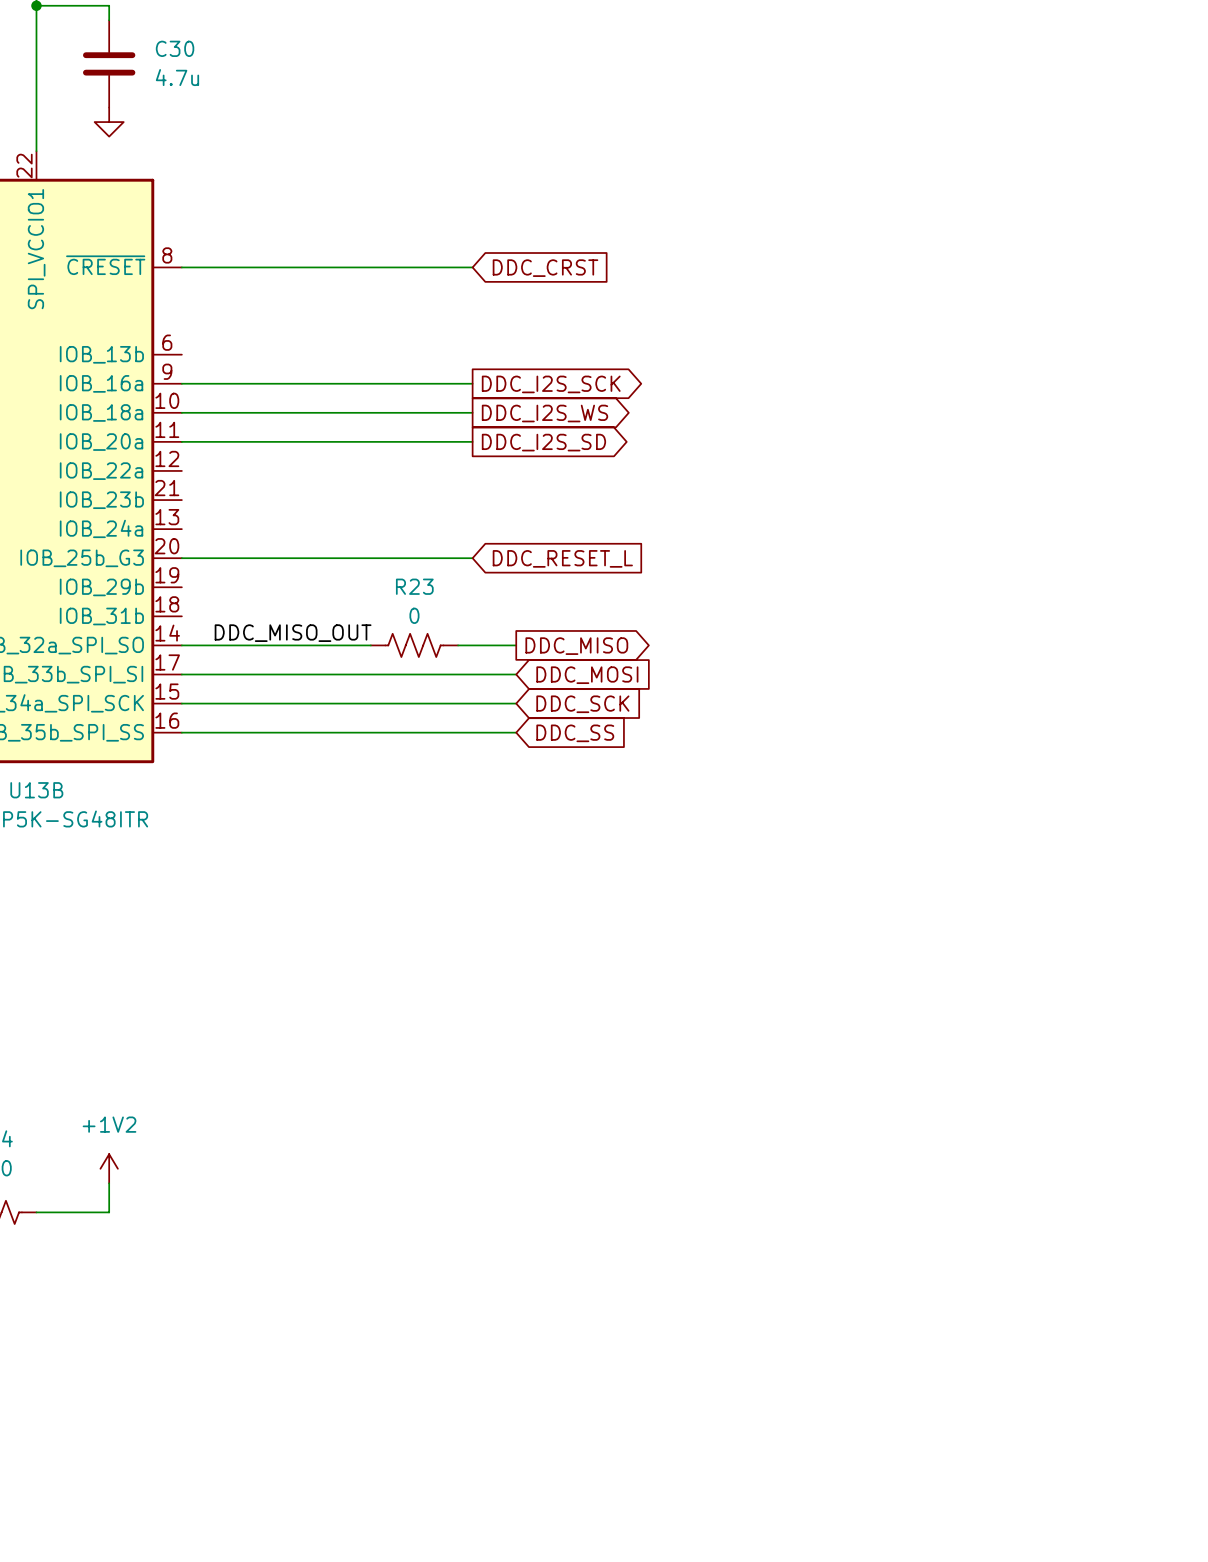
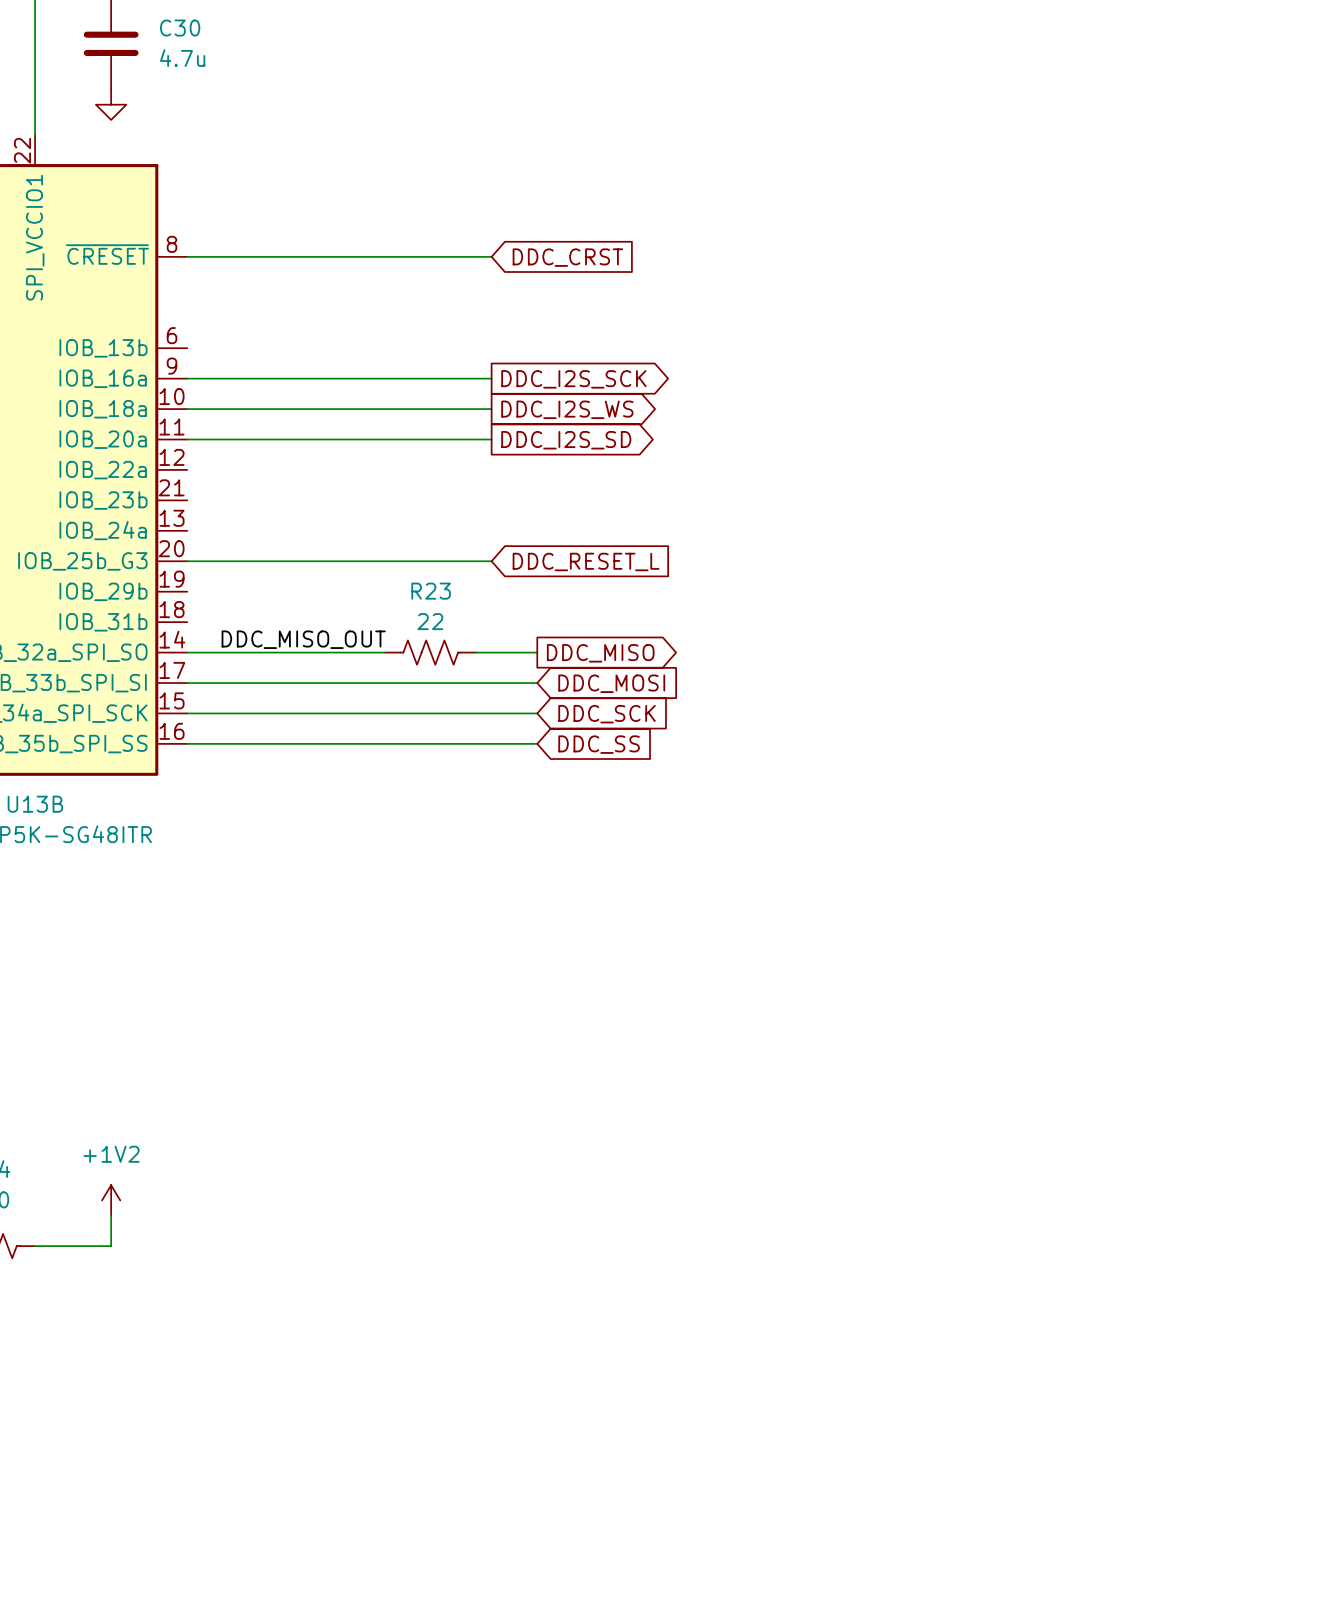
R23 value: 0 (414, 615) -> 22 (430, 621)

